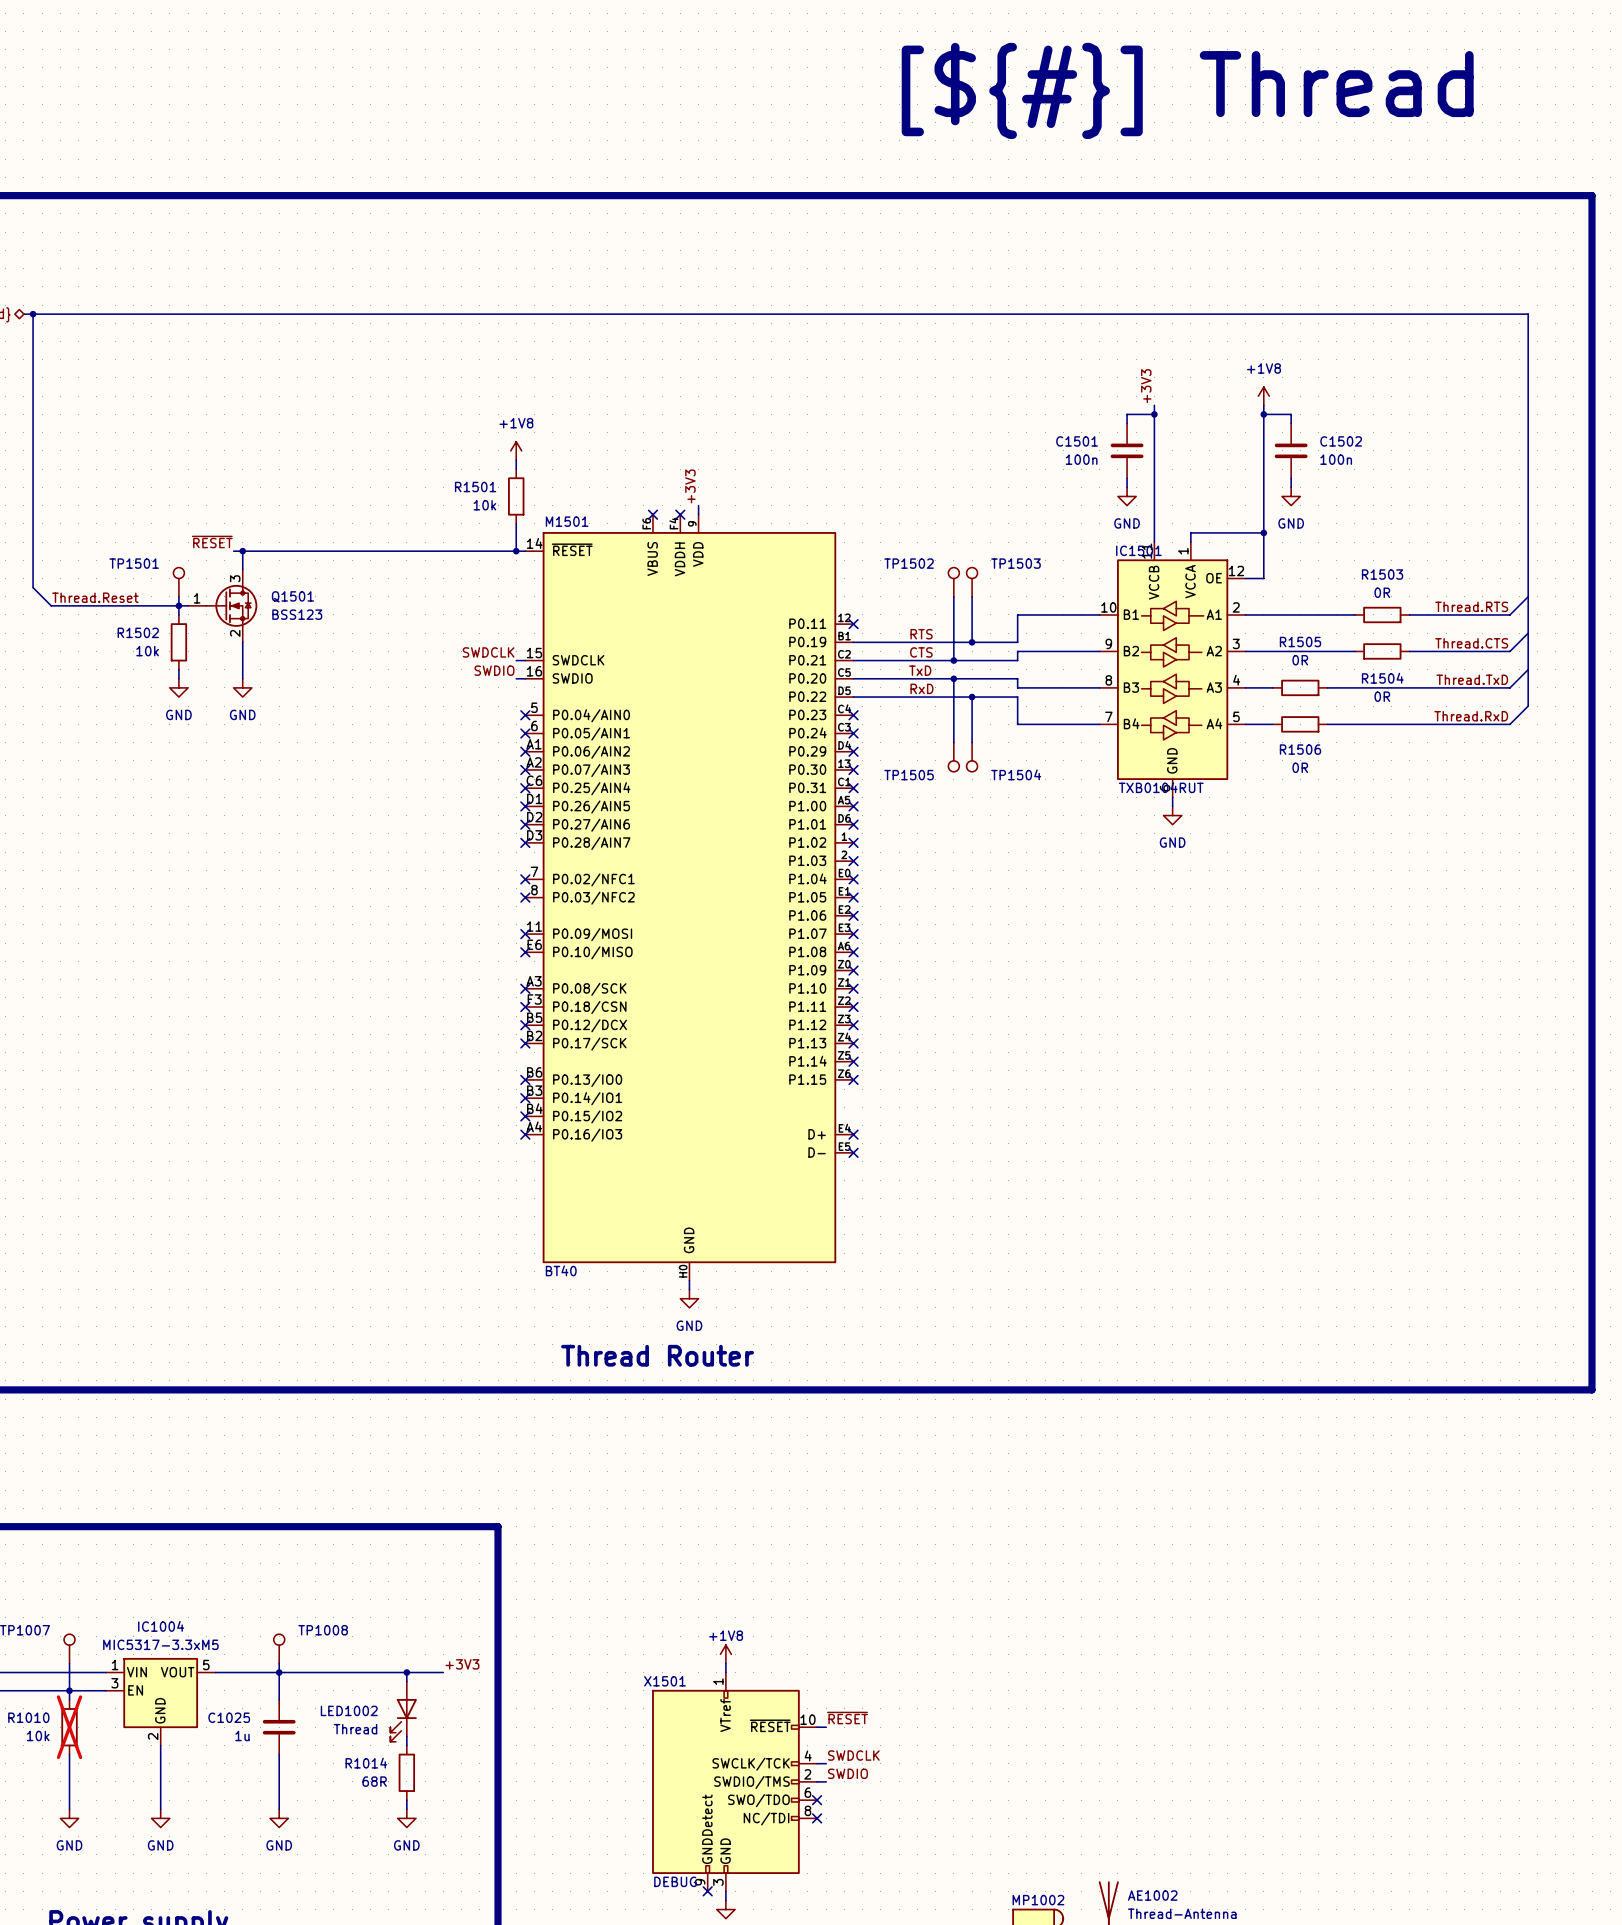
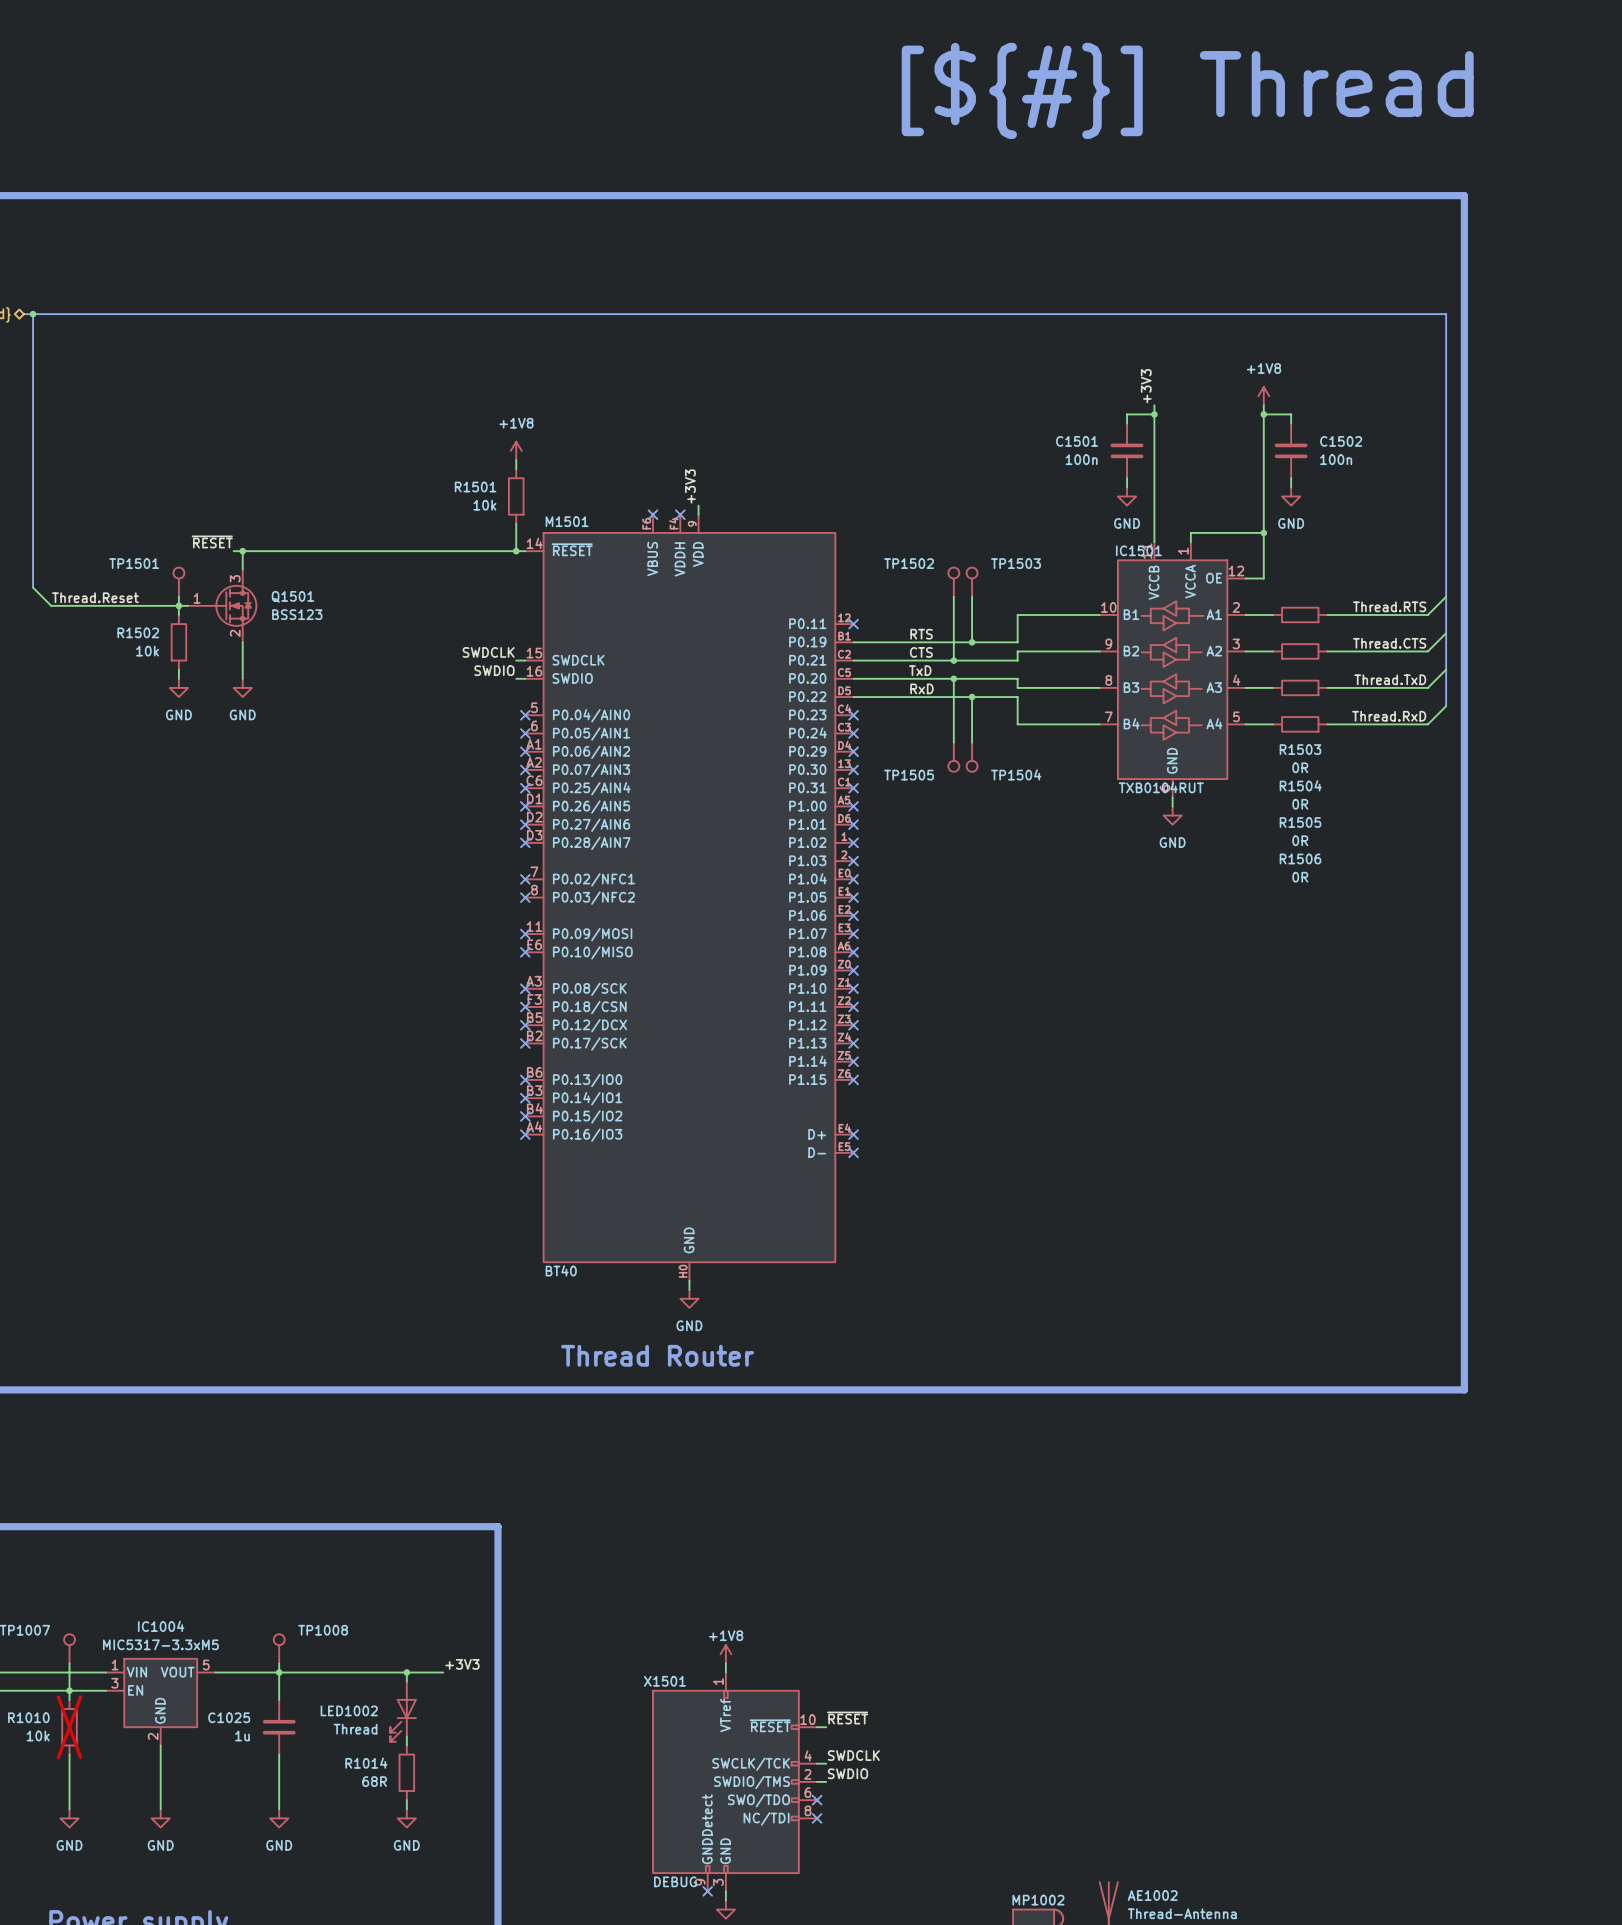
line: (1464, 195) (1592, 195) (1592, 1389) (1464, 1389) -> (1464, 195) (1464, 1389)
bus: (1446, 314) (1528, 314) (1528, 706) -> (1446, 314) (1446, 706)
R1503 name position: R1503 (1382, 574) -> R1503 (1300, 749)
R1503 value position: 0R (1382, 592) -> 0R (1300, 767)
wire: (1528, 596) (1509, 614) (1427, 614) -> (1446, 596) (1427, 614)
label position: Thread.RTS (1471, 606) -> Thread.RTS (1389, 606)
wire: (1272, 614) (1327, 614) -> (1354, 614) (1409, 614)
R1503 position: (1382, 614) -> (1300, 614)
wire: (1528, 633) (1509, 651) (1427, 651) -> (1446, 633) (1427, 651)
R1505 name position: R1505 (1300, 641) -> R1505 (1300, 822)
label position: Thread.CTS (1471, 643) -> Thread.CTS (1389, 643)
wire: (1272, 651) (1327, 651) -> (1354, 651) (1409, 651)
R1504 position: (1382, 651) -> (1300, 651)
R1505 value position: 0R (1300, 660) -> 0R (1300, 840)
wire: (1528, 669) (1509, 687) (1427, 687) -> (1446, 669) (1427, 687)
R1504 name position: R1504 (1382, 678) -> R1504 (1300, 785)
label position: Thread.TxD (1472, 679) -> Thread.TxD (1390, 679)
R1504 value position: 0R (1382, 696) -> 0R (1300, 804)
wire: (1528, 706) (1509, 724) (1427, 724) -> (1446, 706) (1427, 724)
label position: Thread.RxD (1471, 716) -> Thread.RxD (1389, 716)
R1506 name position: R1506 (1300, 749) -> R1506 (1300, 858)
R1506 value position: 0R (1300, 767) -> 0R (1300, 877)

